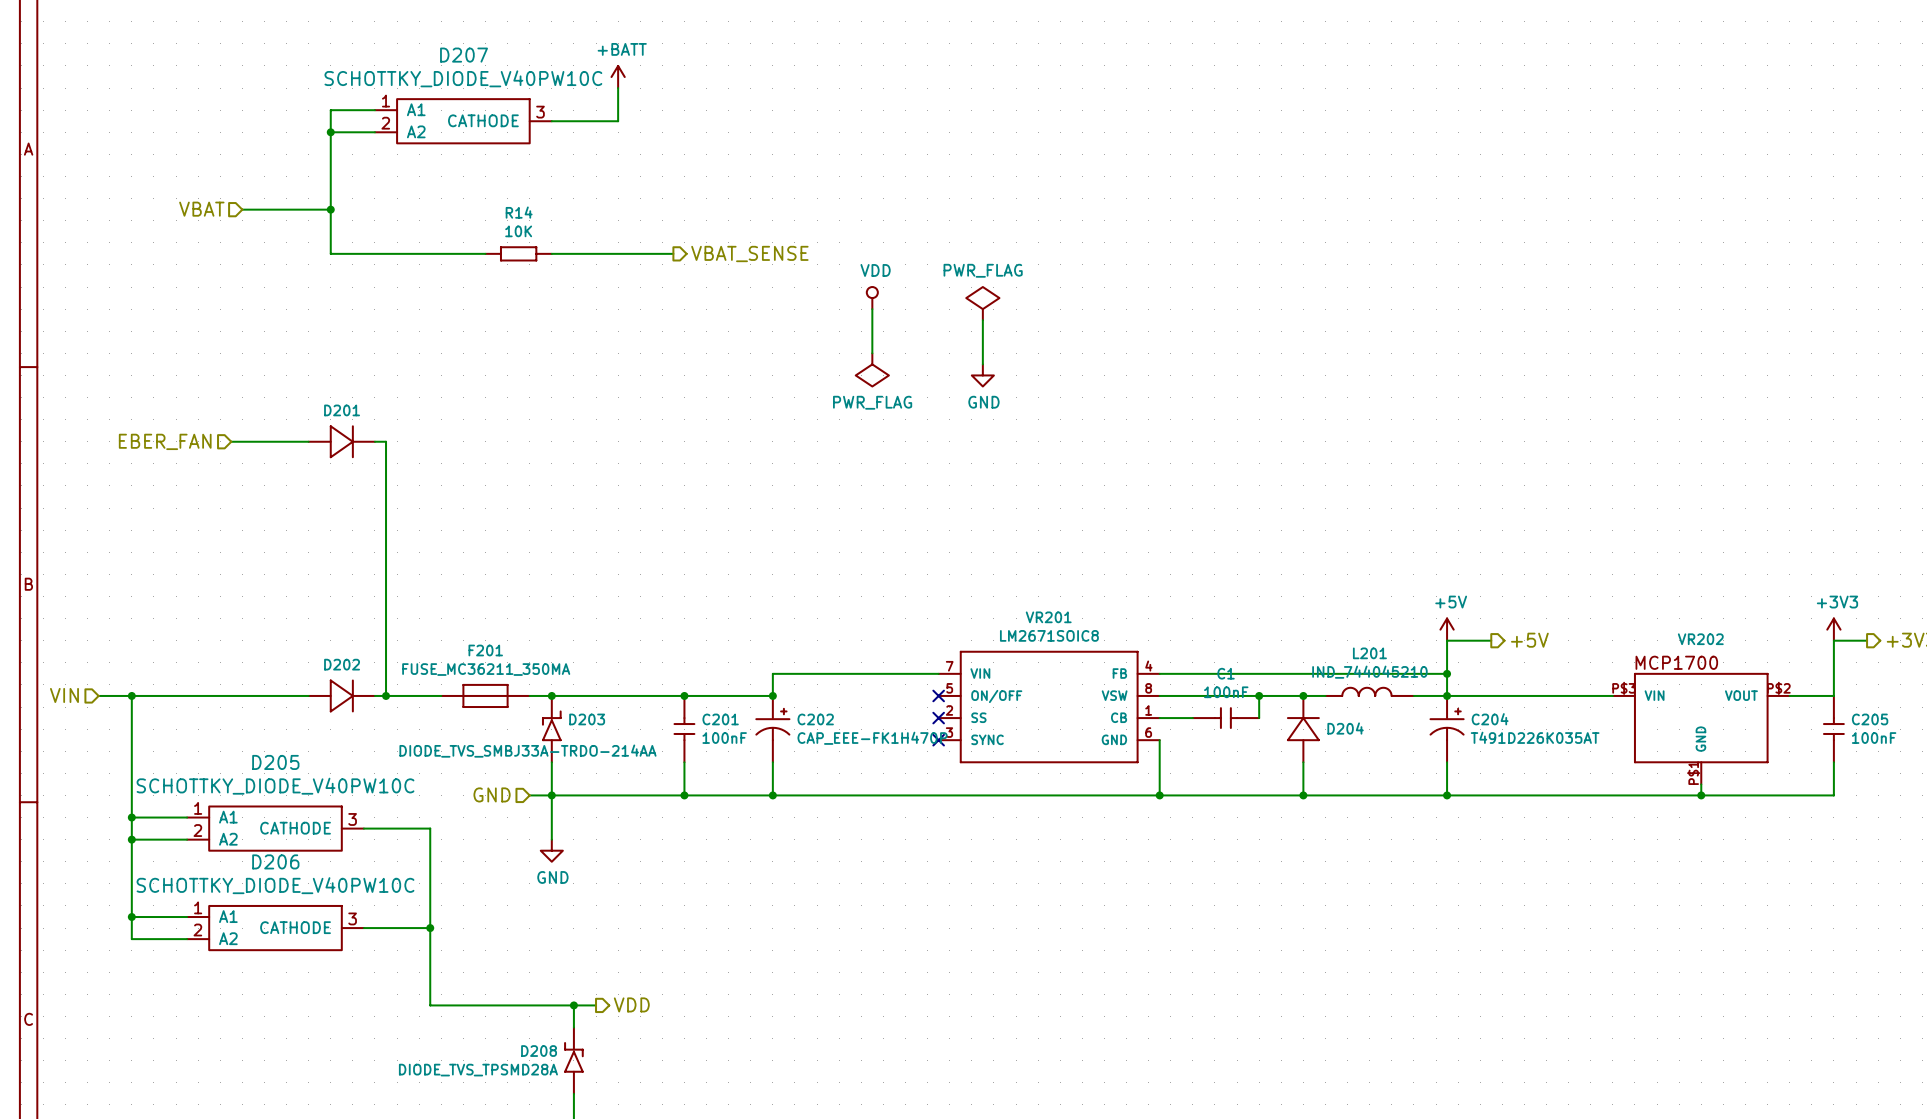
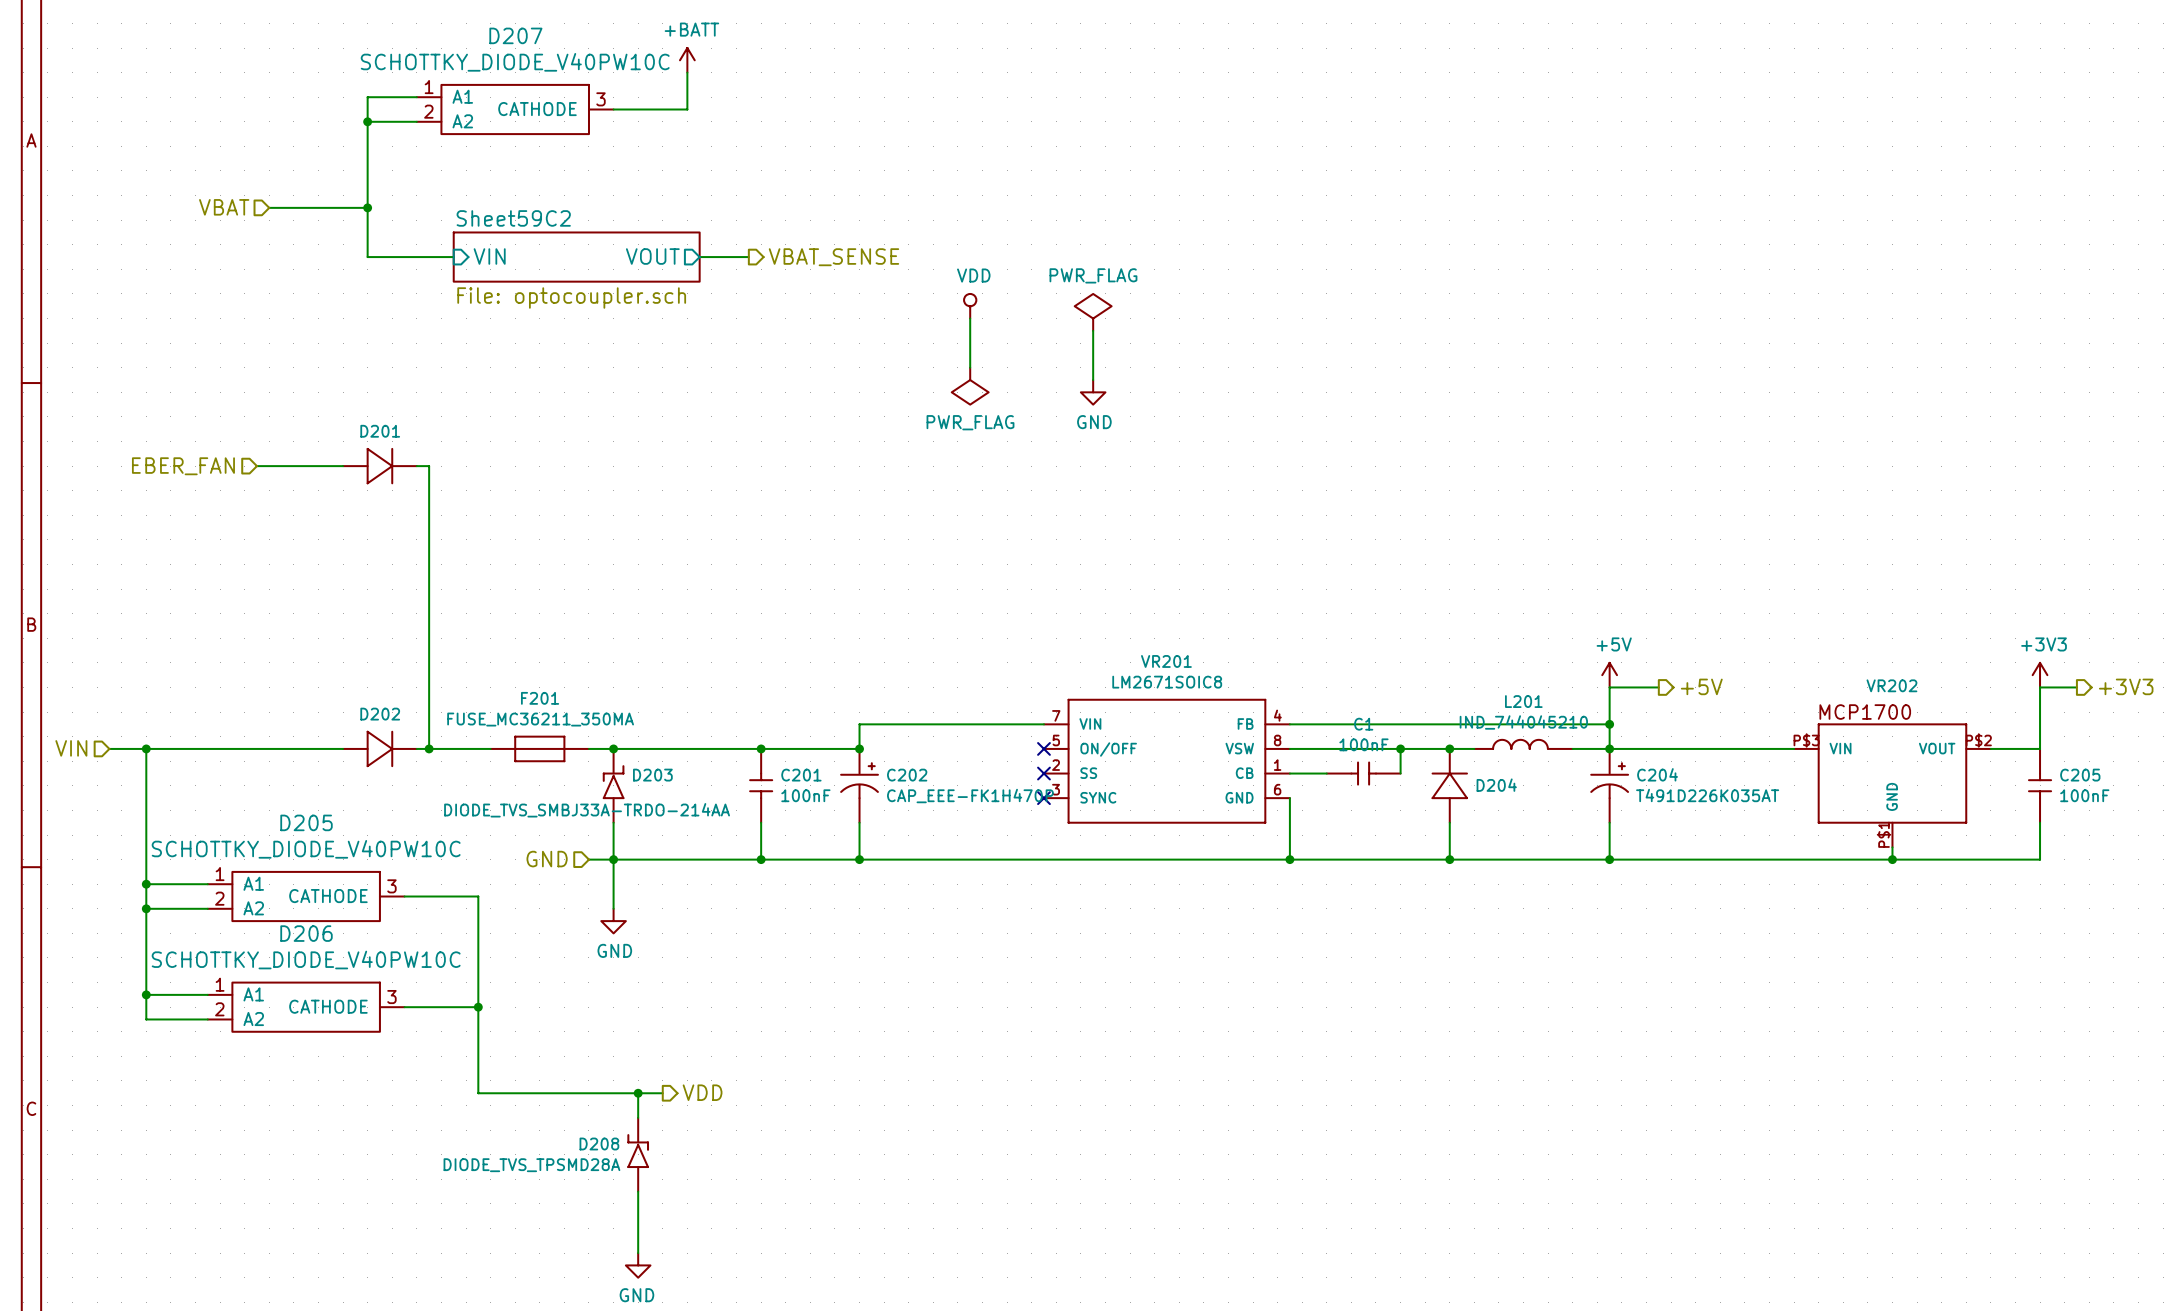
wire: (408, 253) (485, 253) -> none
sheet pin: none -> VIN (489, 256)
R14: 10K (518, 253) -> none
sheet Sheet59C2: none -> File: optocoupler.sch (576, 257)
wire: (551, 253) (629, 253) -> none
sheet pin: none -> VOUT (652, 256)

